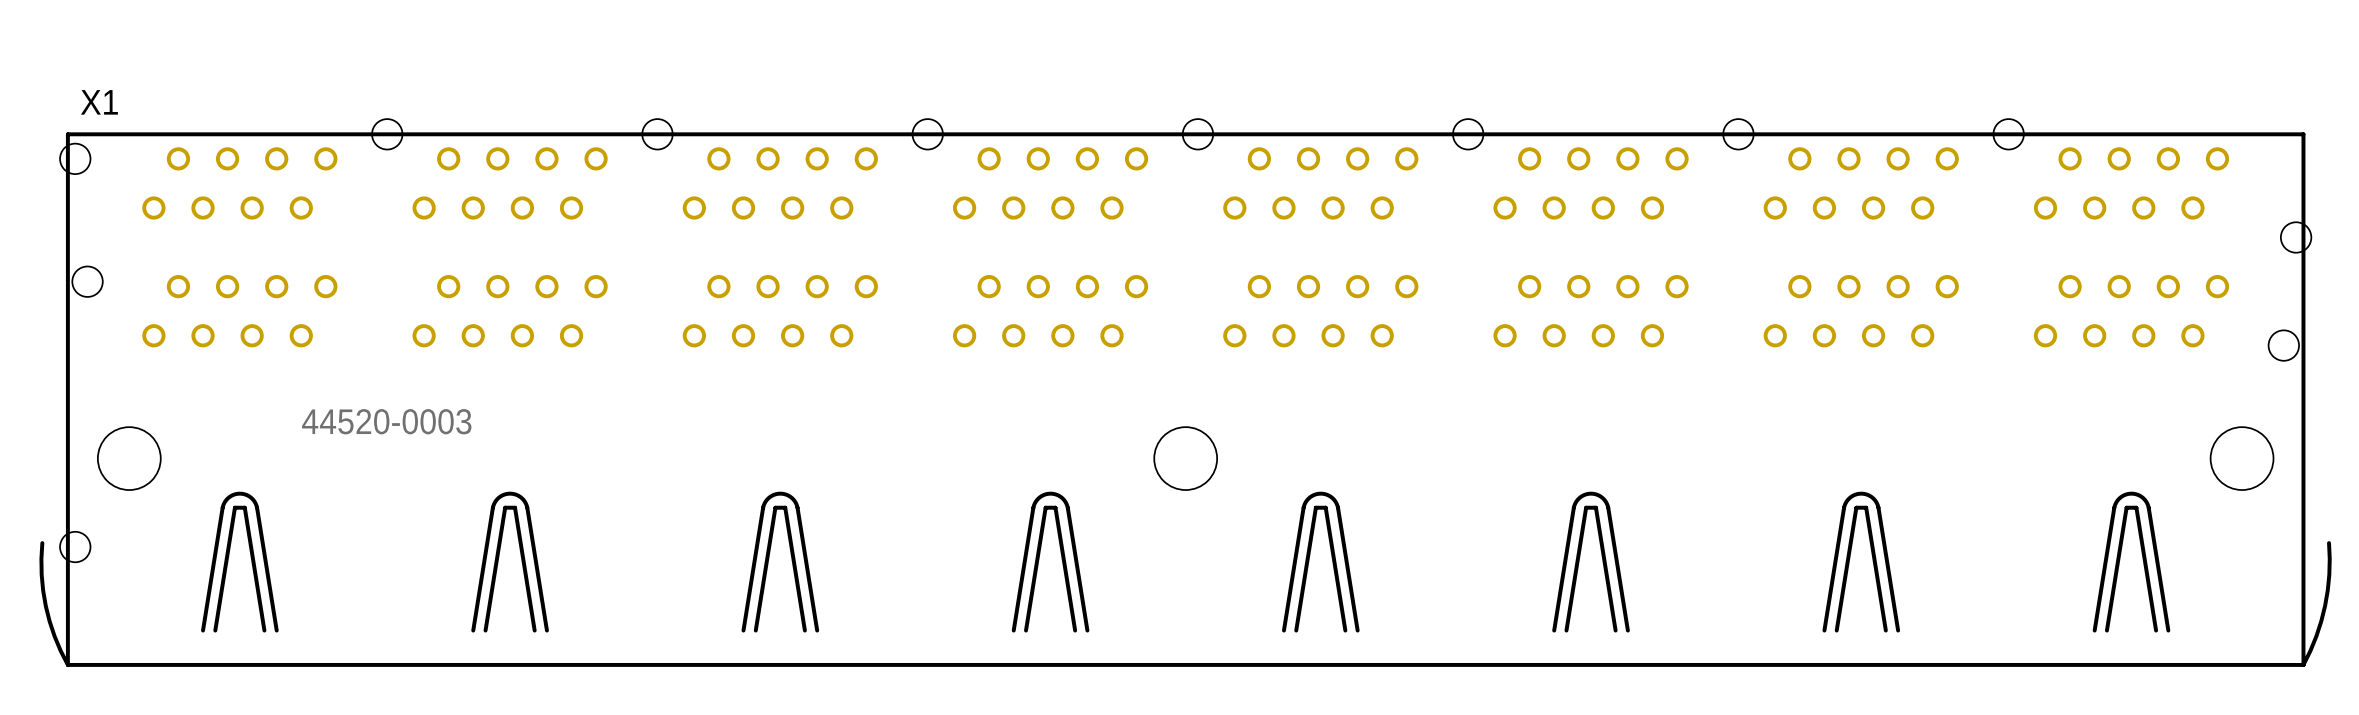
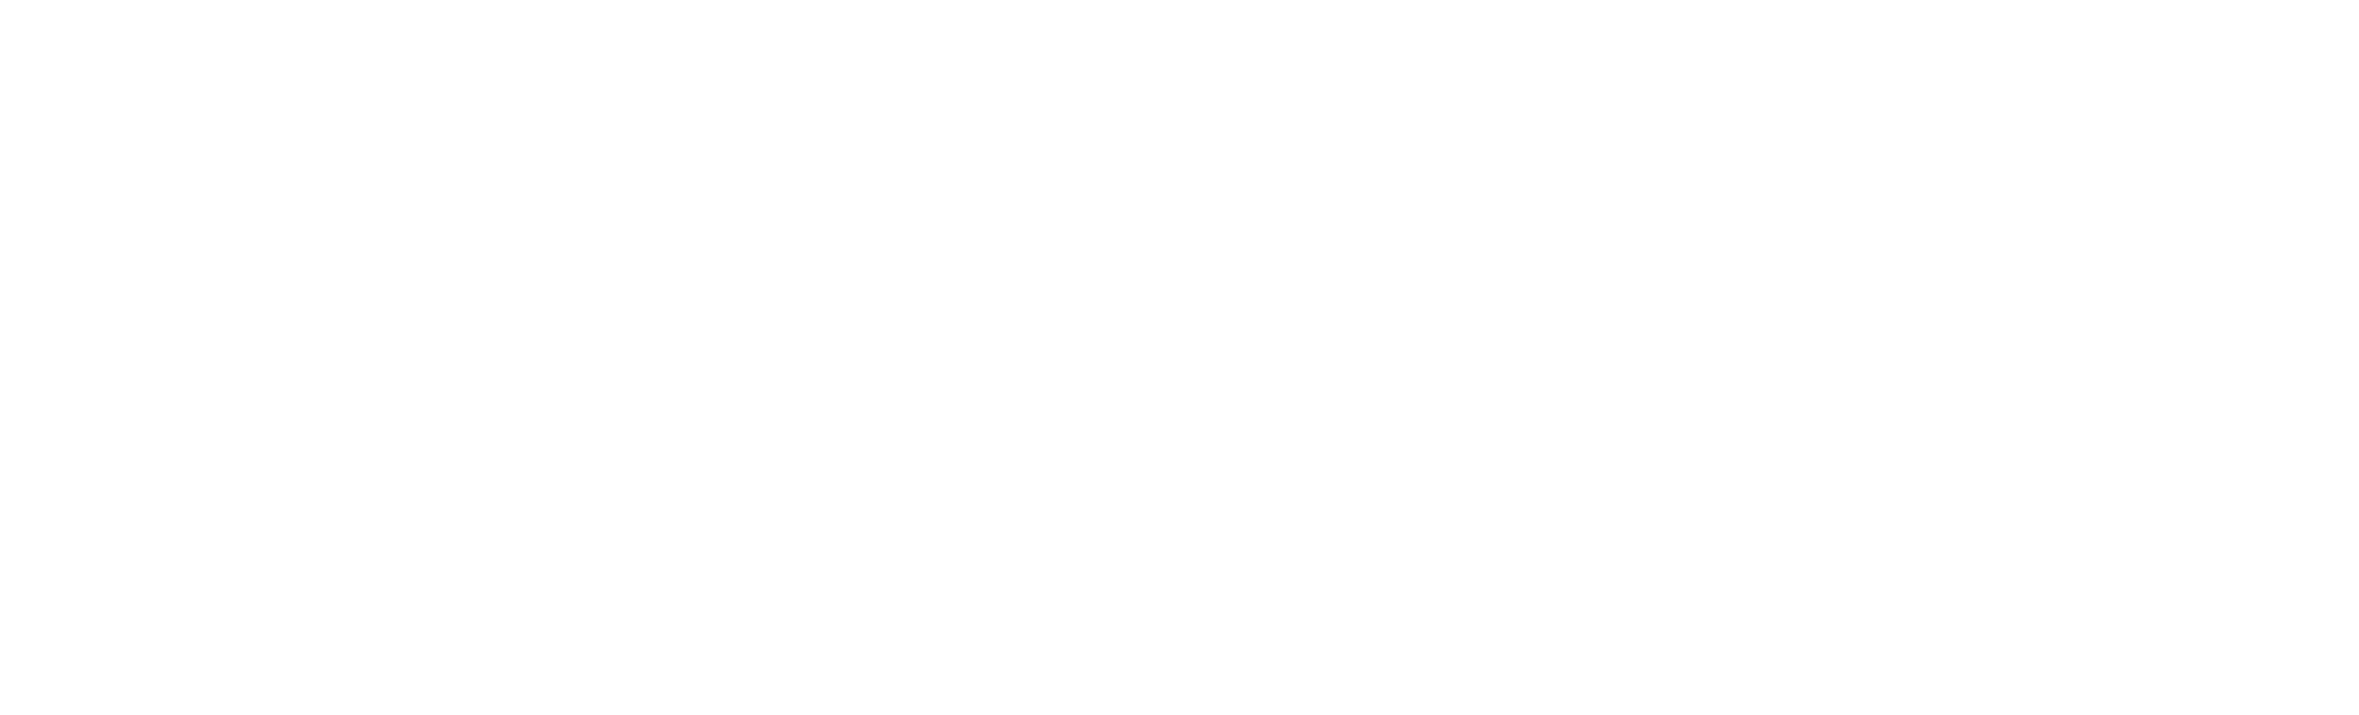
X1: 44520-0003 (1185, 392) -> none

